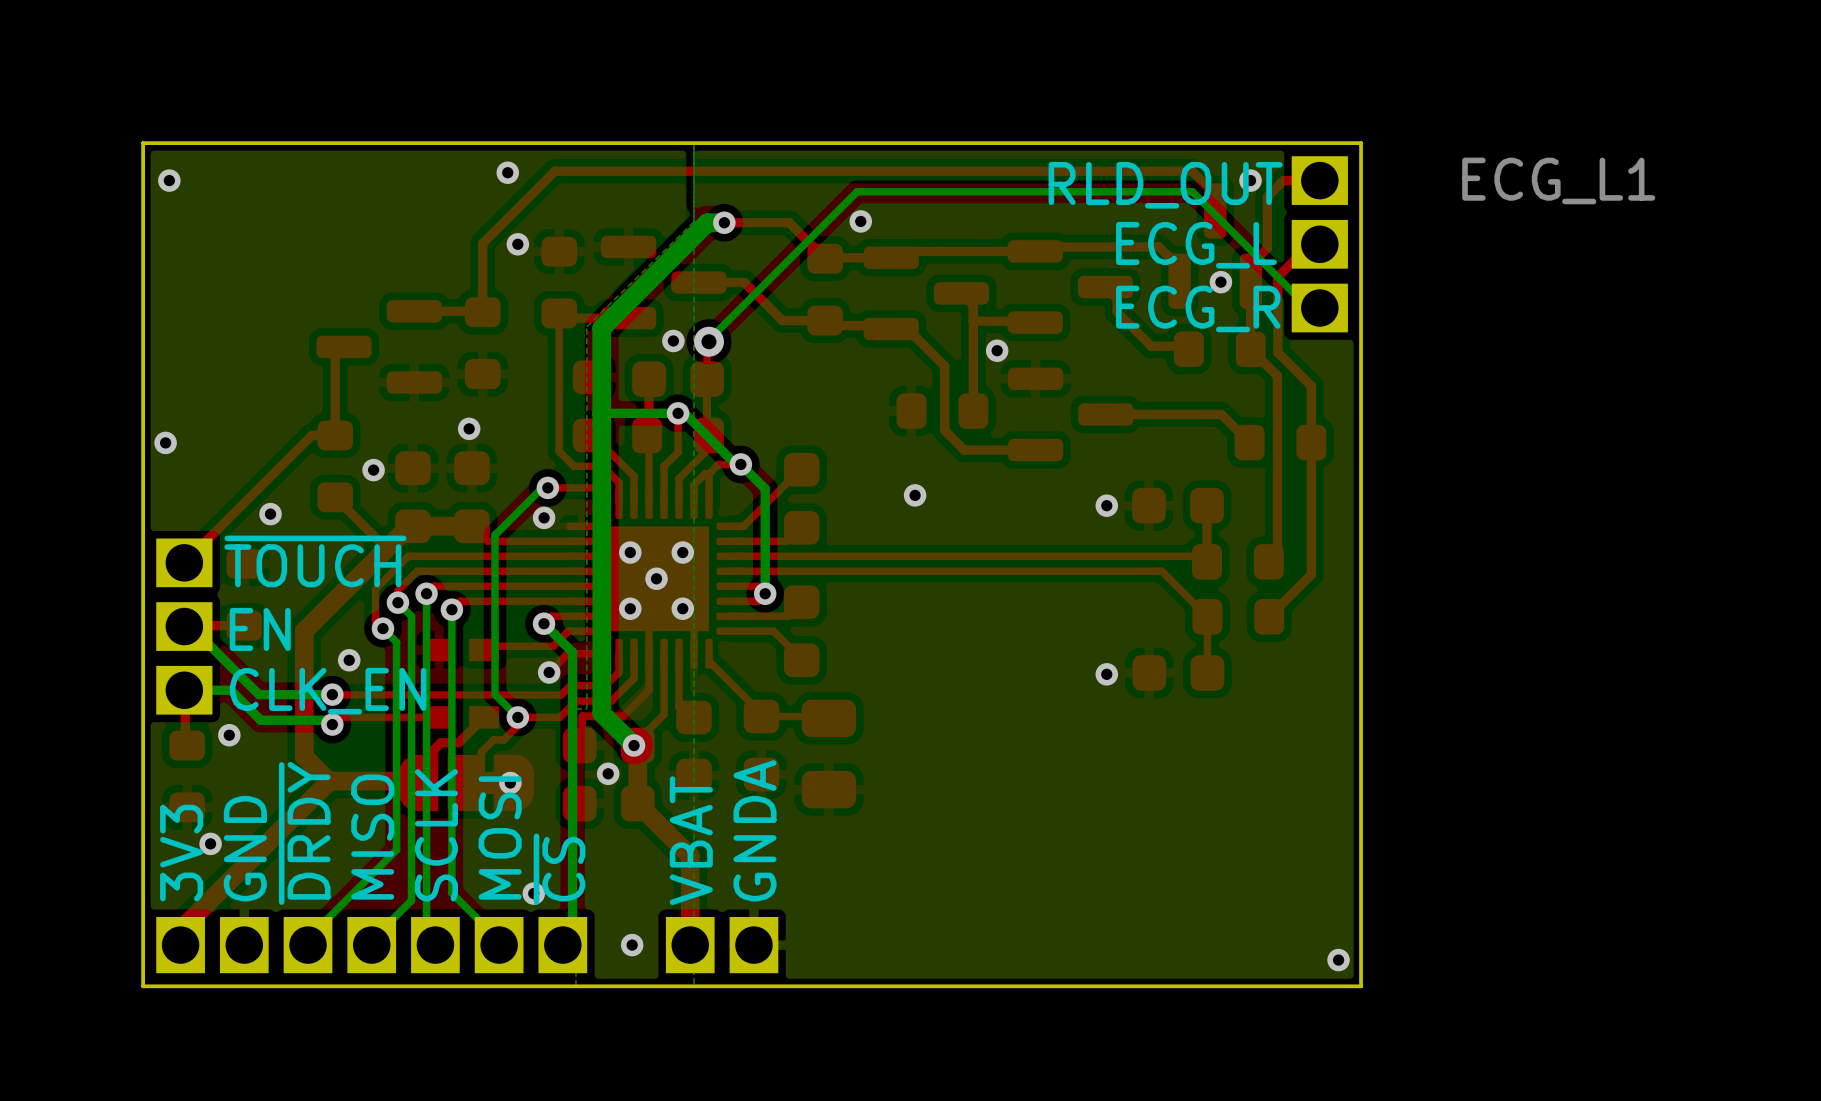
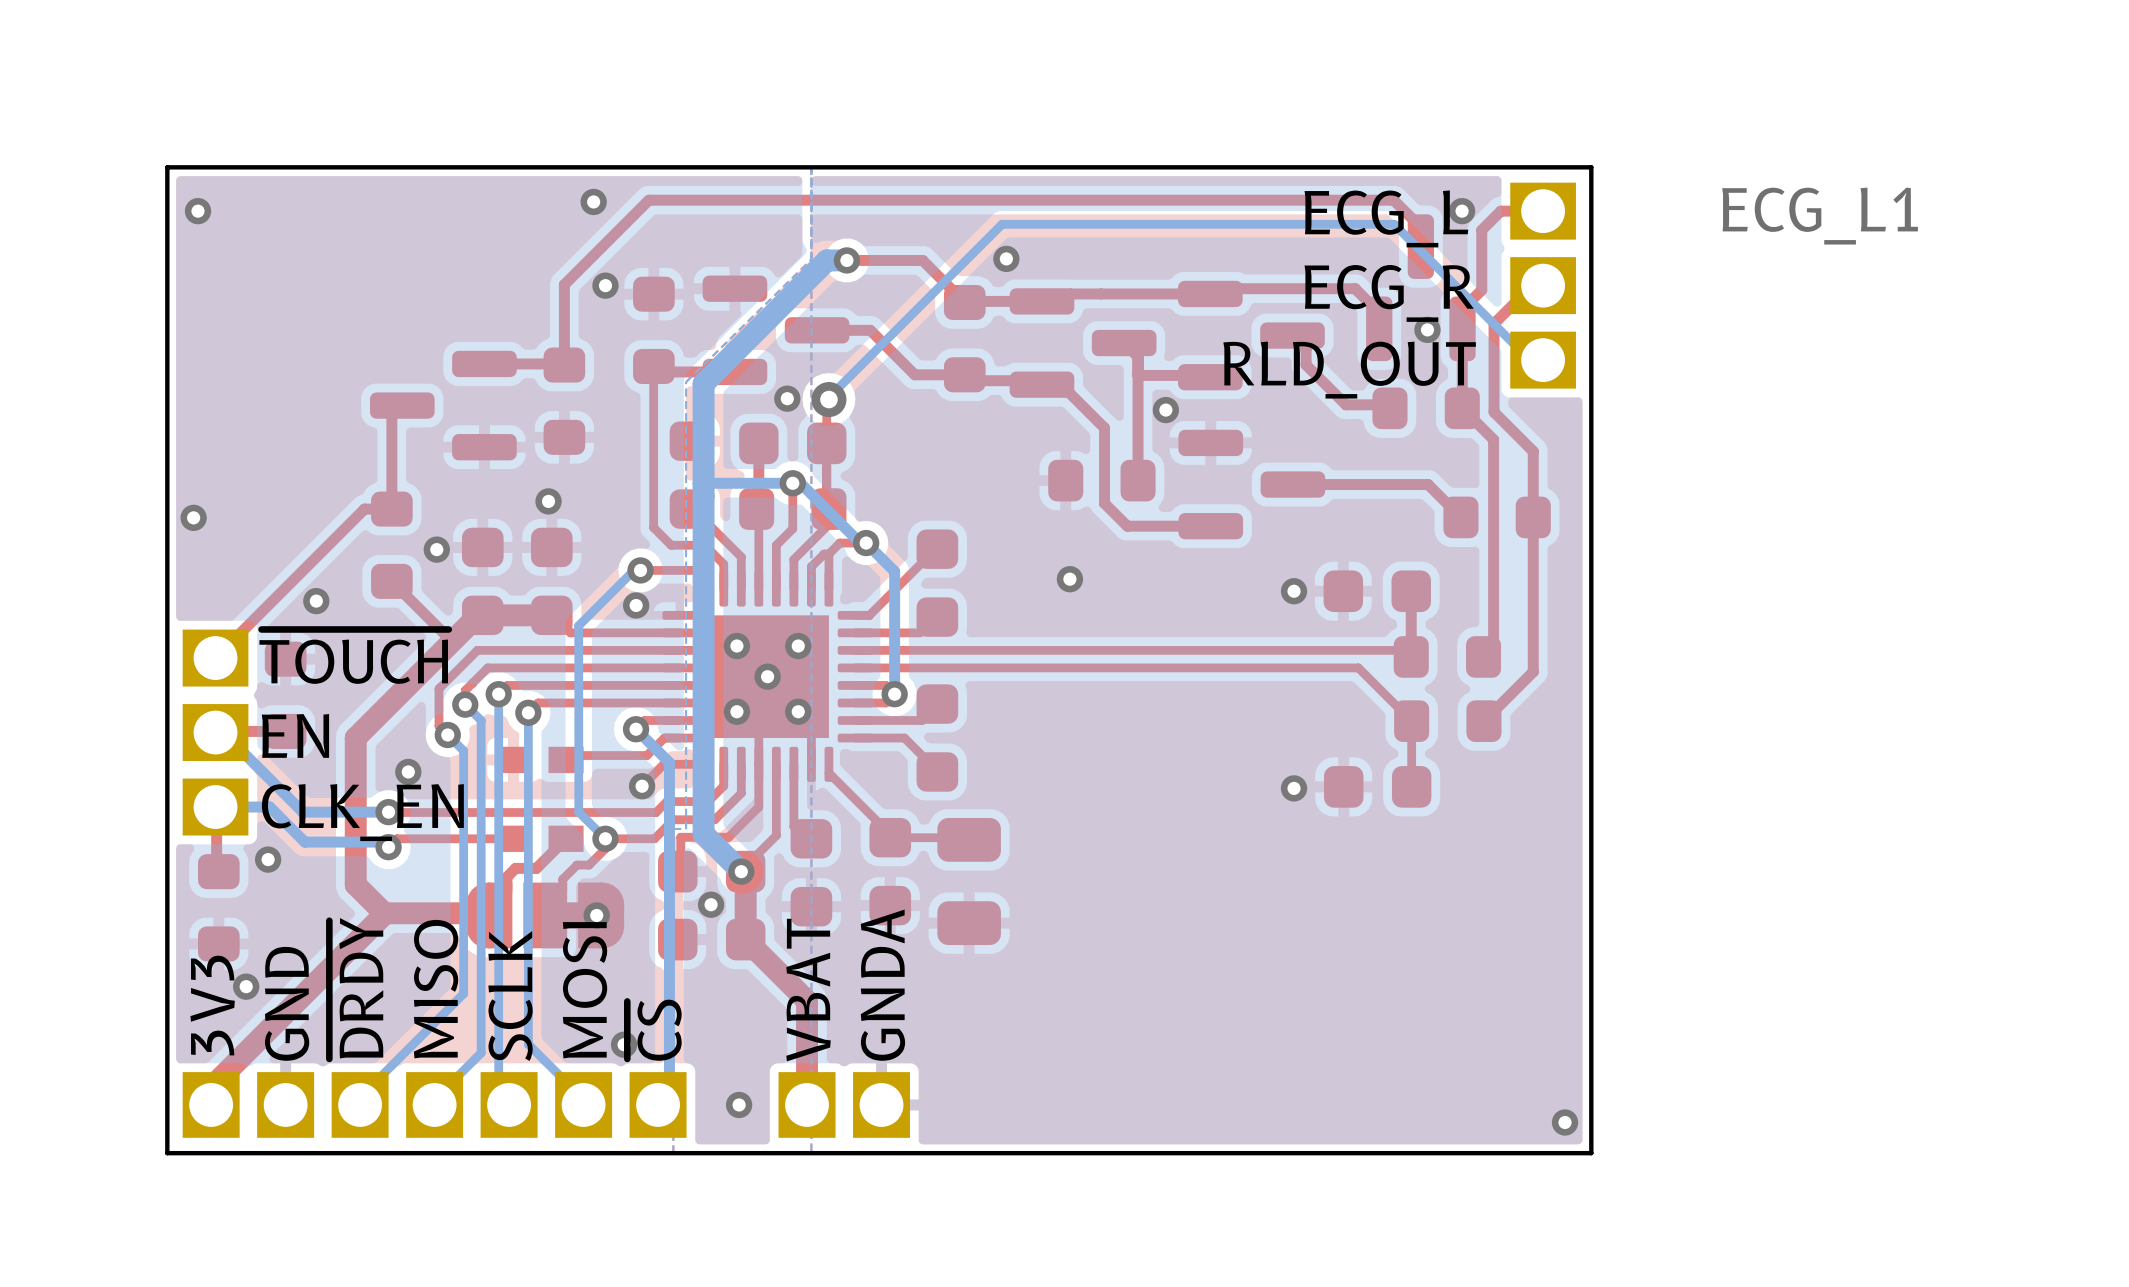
text position: RLD_OUT (1165, 185) -> RLD_OUT (1349, 370)
text position: ECG_L (1196, 245) -> ECG_L (1386, 218)
text position: ECG_R (1198, 308) -> ECG_R (1389, 293)

